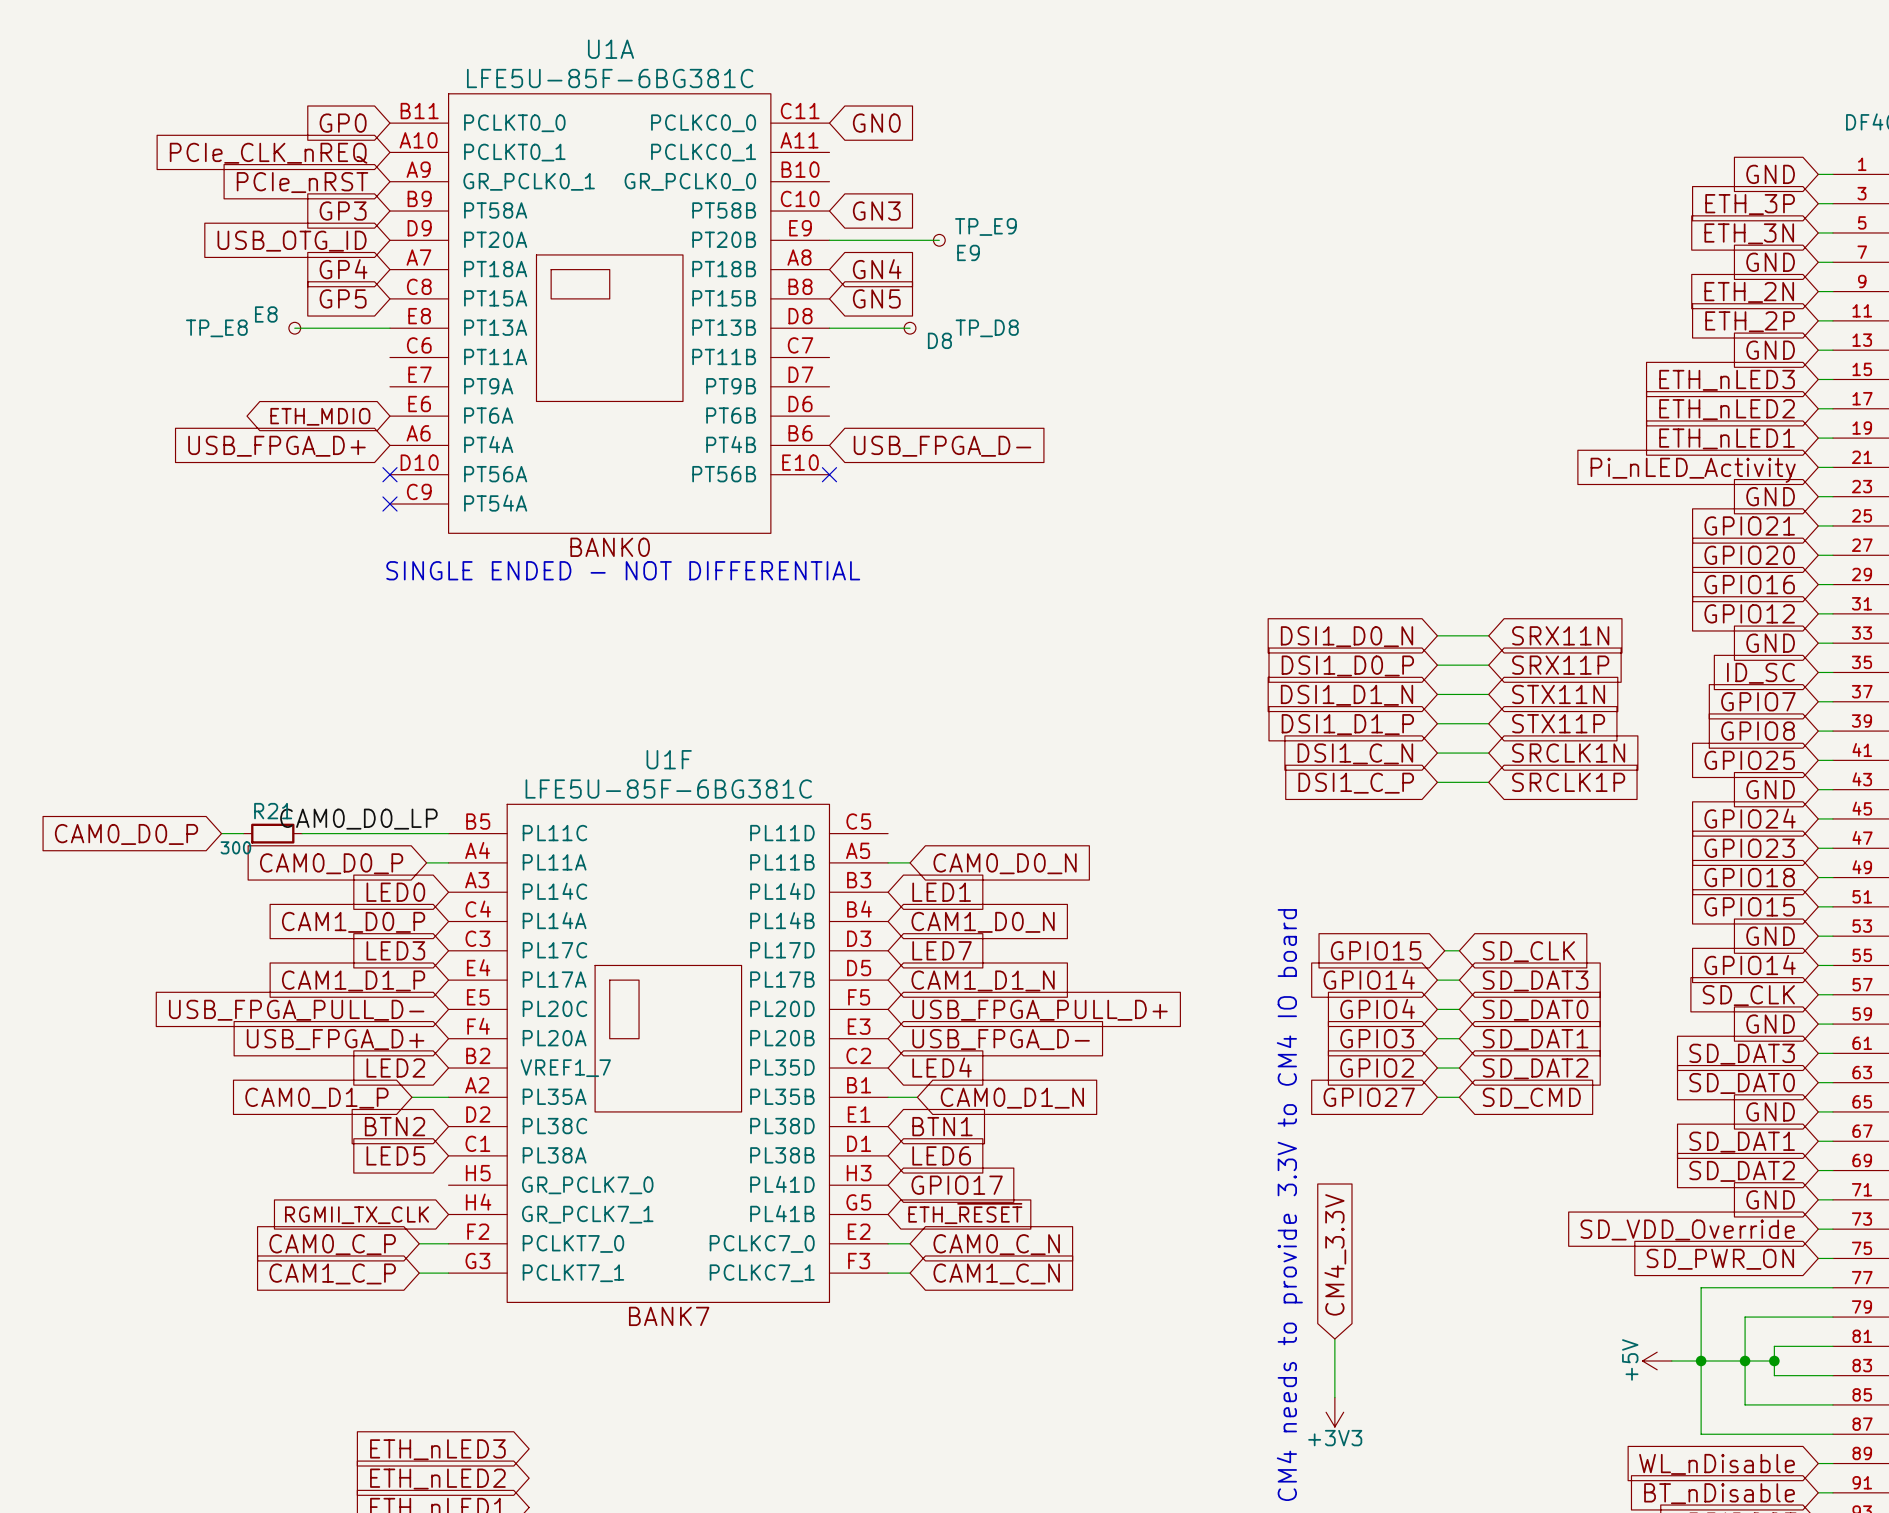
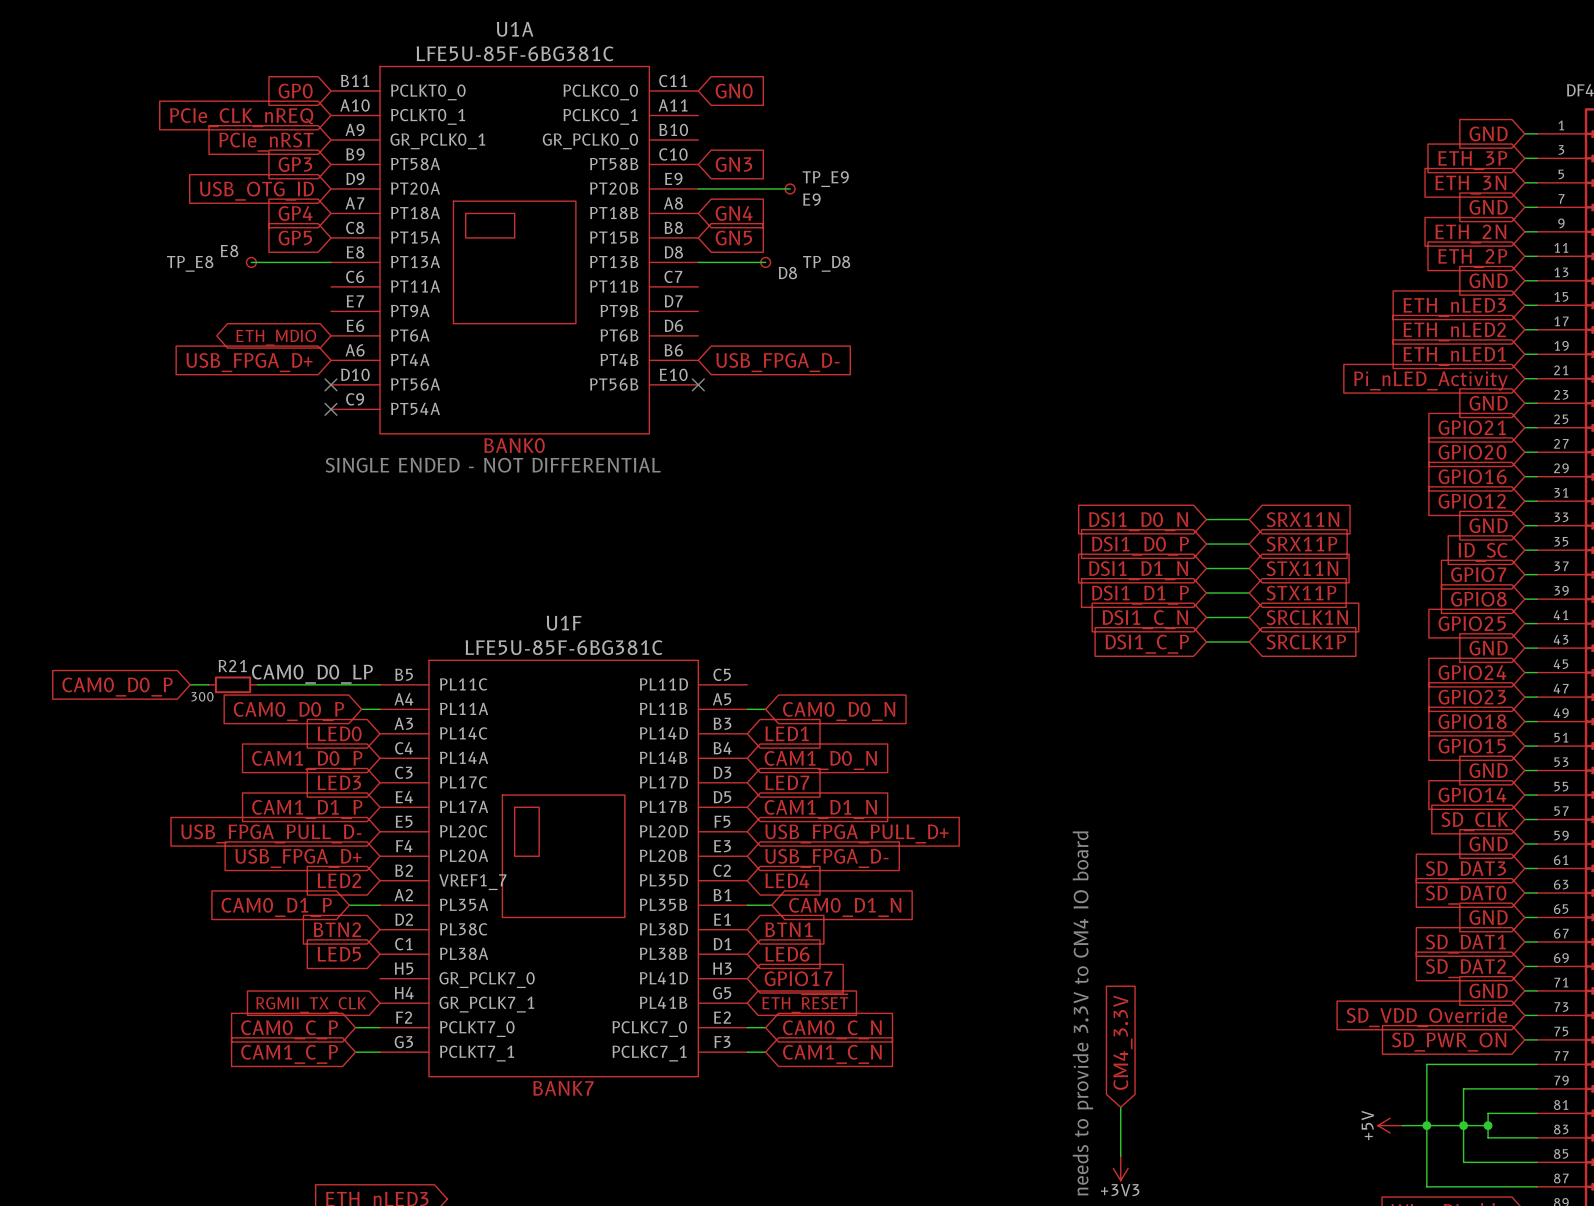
global label: GPIO15 (1376, 950) -> none
wire: (1444, 950) (1459, 950) -> none
global label: SD_CLK (1528, 951) -> none
global label: GPIO14 (1369, 979) -> none
wire: (1437, 980) (1459, 980) -> none
global label: SD_DAT3 (1535, 980) -> none
global label: GPIO4 (1377, 1008) -> none
wire: (1437, 1009) (1459, 1009) -> none
global label: SD_DAT0 (1535, 1010) -> none
global label: GPIO3 (1377, 1038) -> none
wire: (1437, 1038) (1459, 1038) -> none
global label: SD_DAT1 (1535, 1039) -> none
global label: GPIO2 (1377, 1068) -> none
wire: (1437, 1068) (1459, 1068) -> none
global label: SD_DAT2 (1535, 1068) -> none
global label: GPIO27 (1369, 1097) -> none
wire: (1437, 1097) (1459, 1097) -> none
global label: SD_CMD (1531, 1098) -> none

